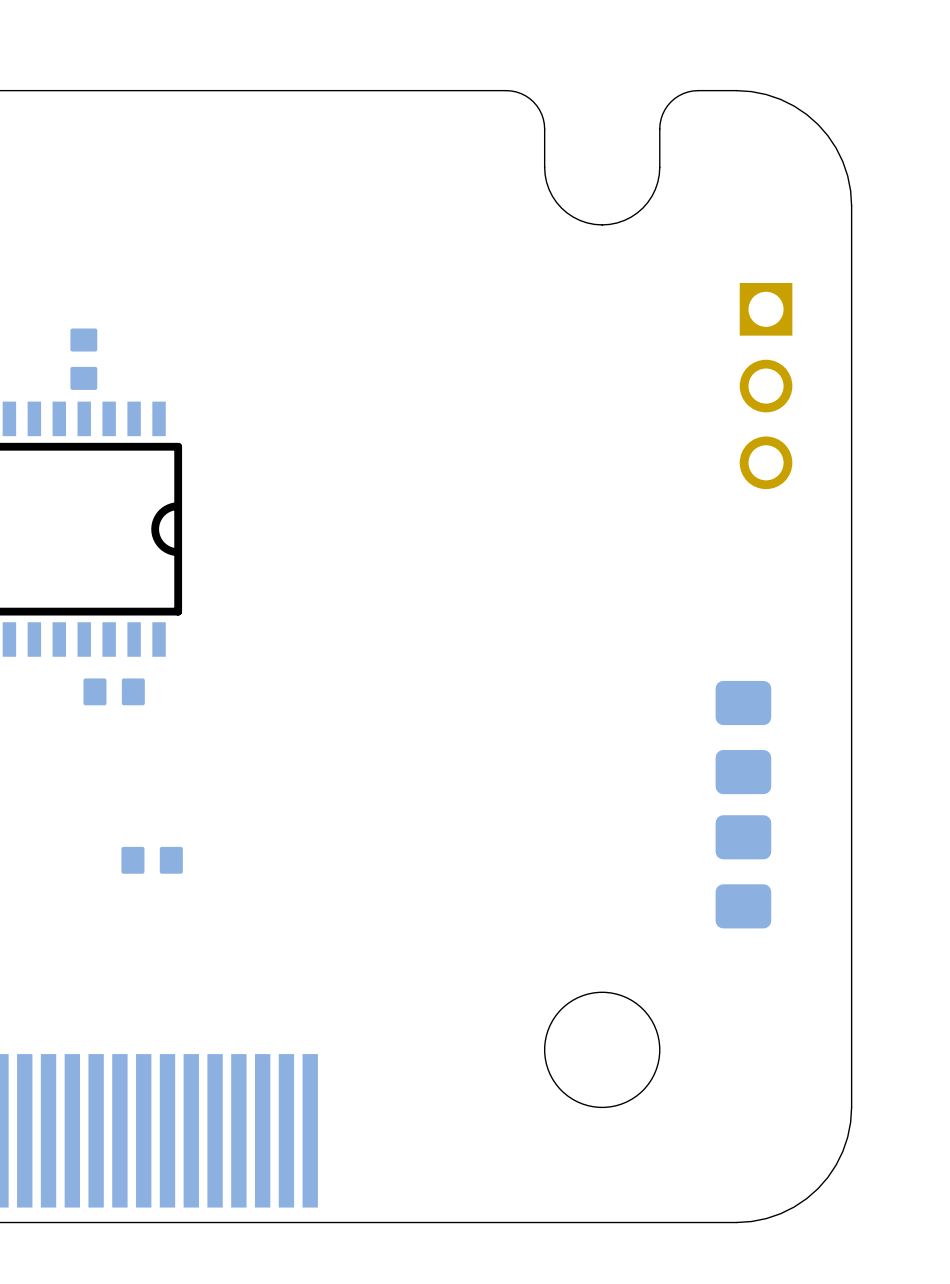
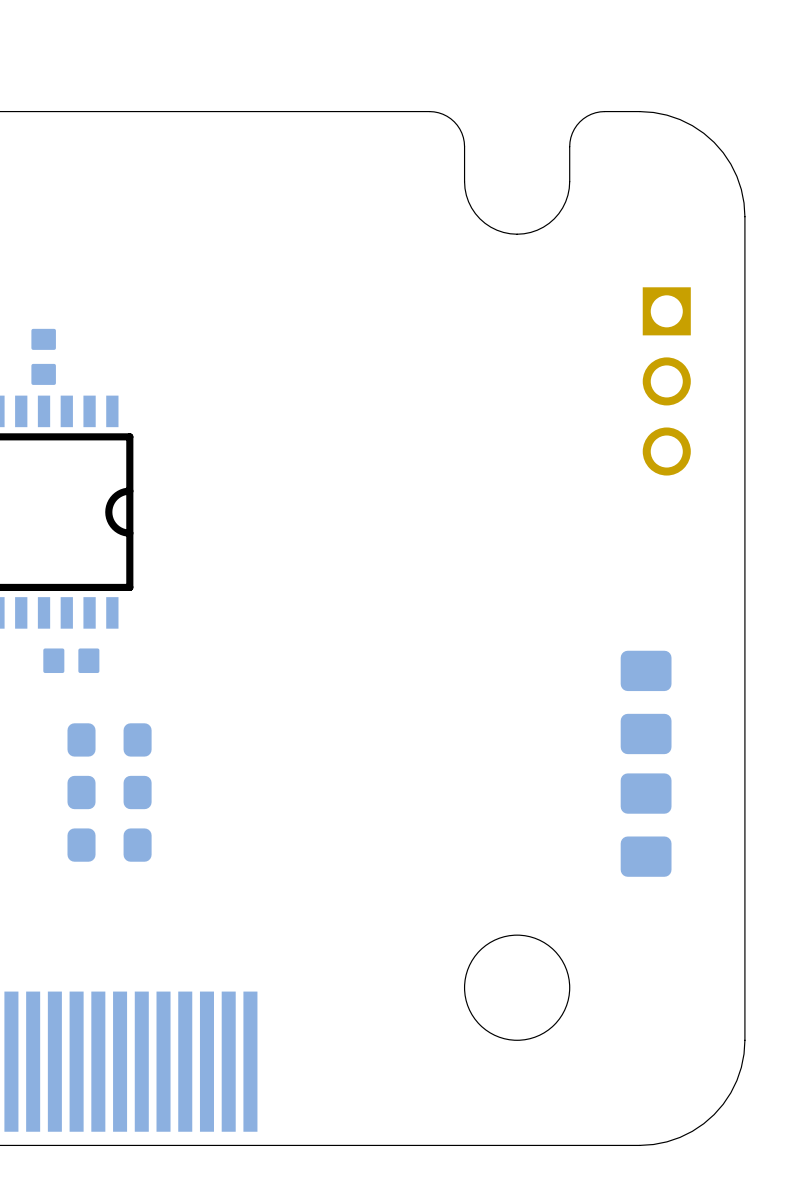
part: none -> (109, 739)
part: none -> (109, 792)
part: (152, 860) -> none
part: none -> (109, 845)

